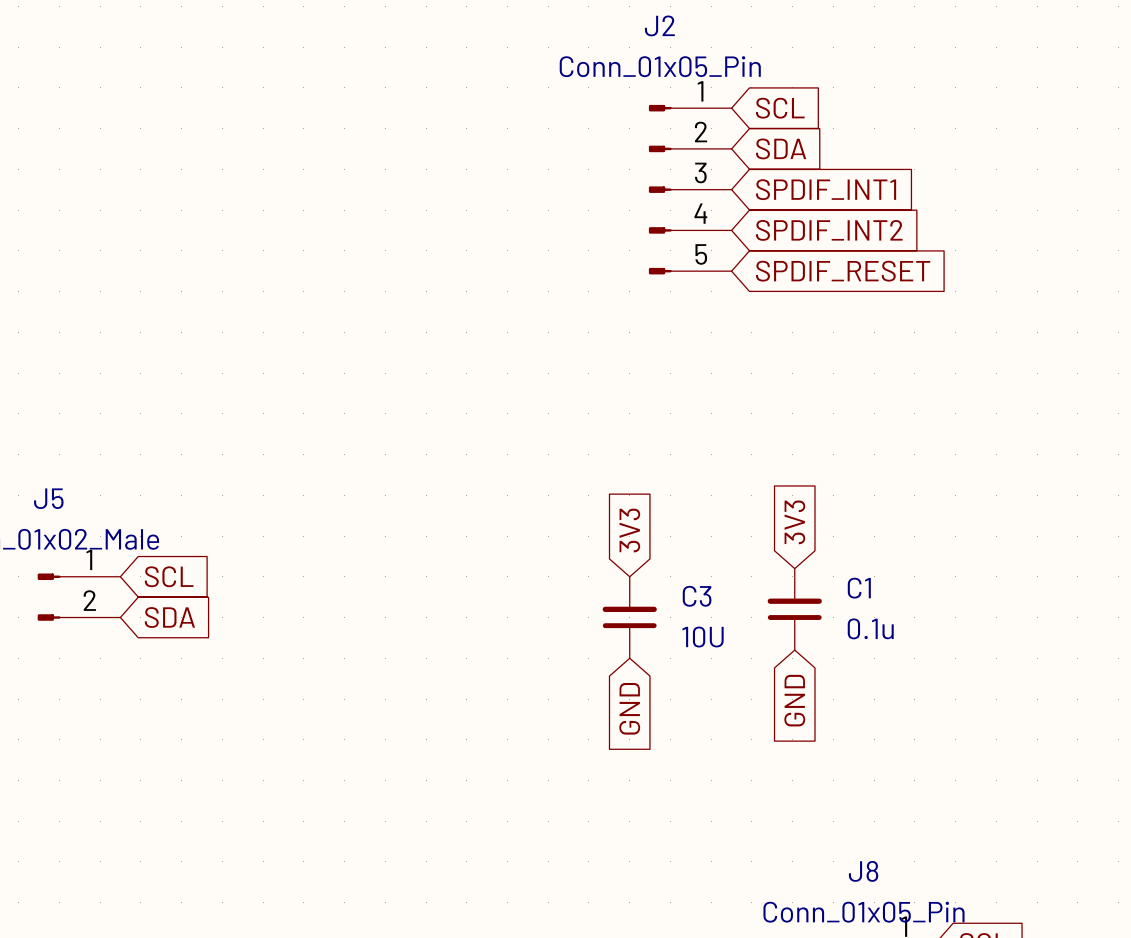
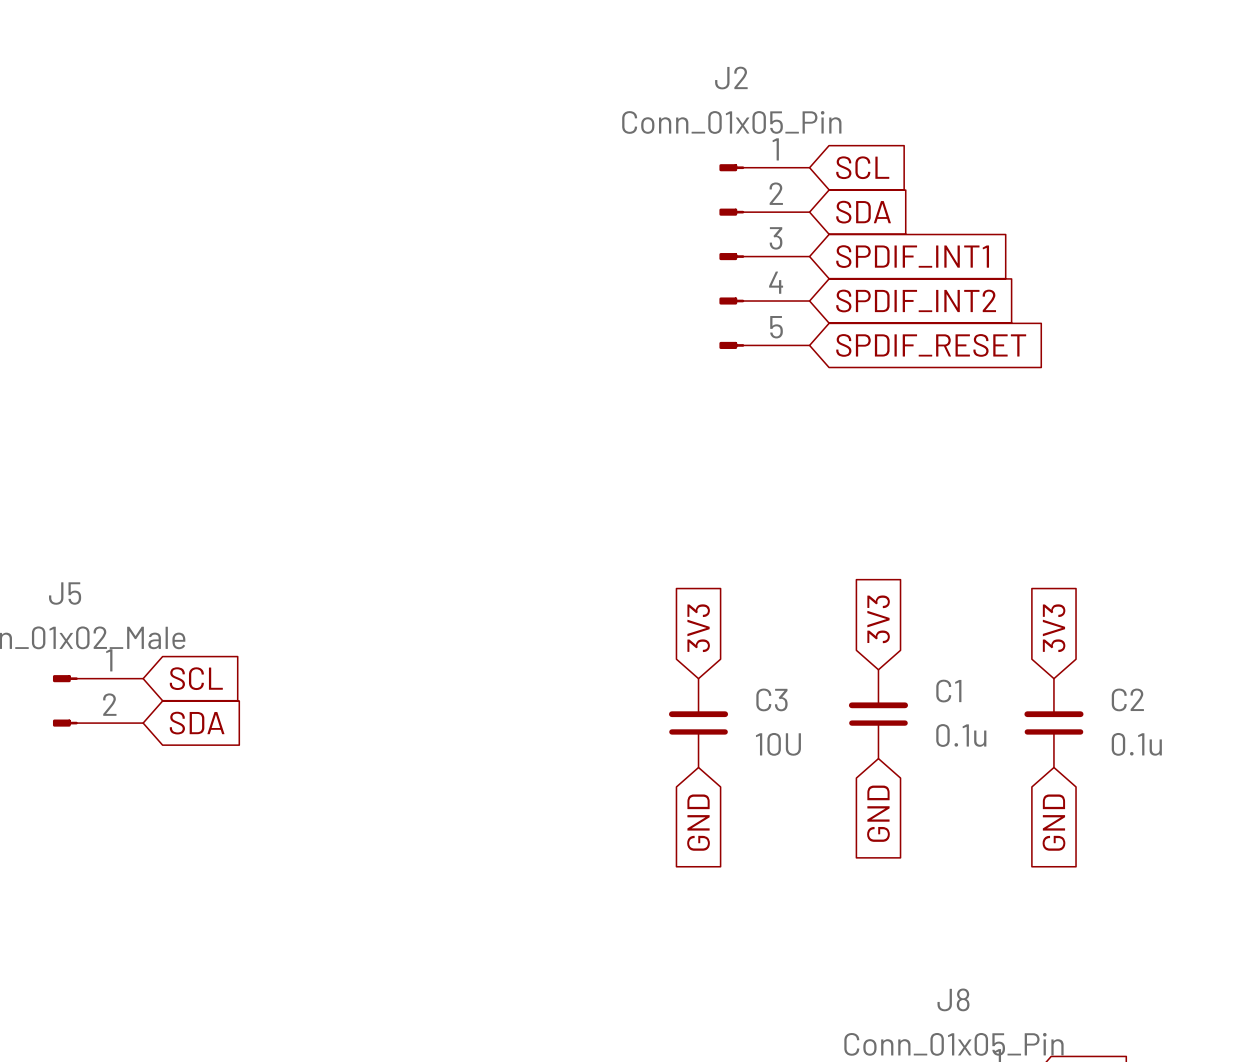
global label: none -> 3V3 (1054, 628)
C2: none -> 0.1u (1053, 723)
global label: none -> GND (1053, 822)

